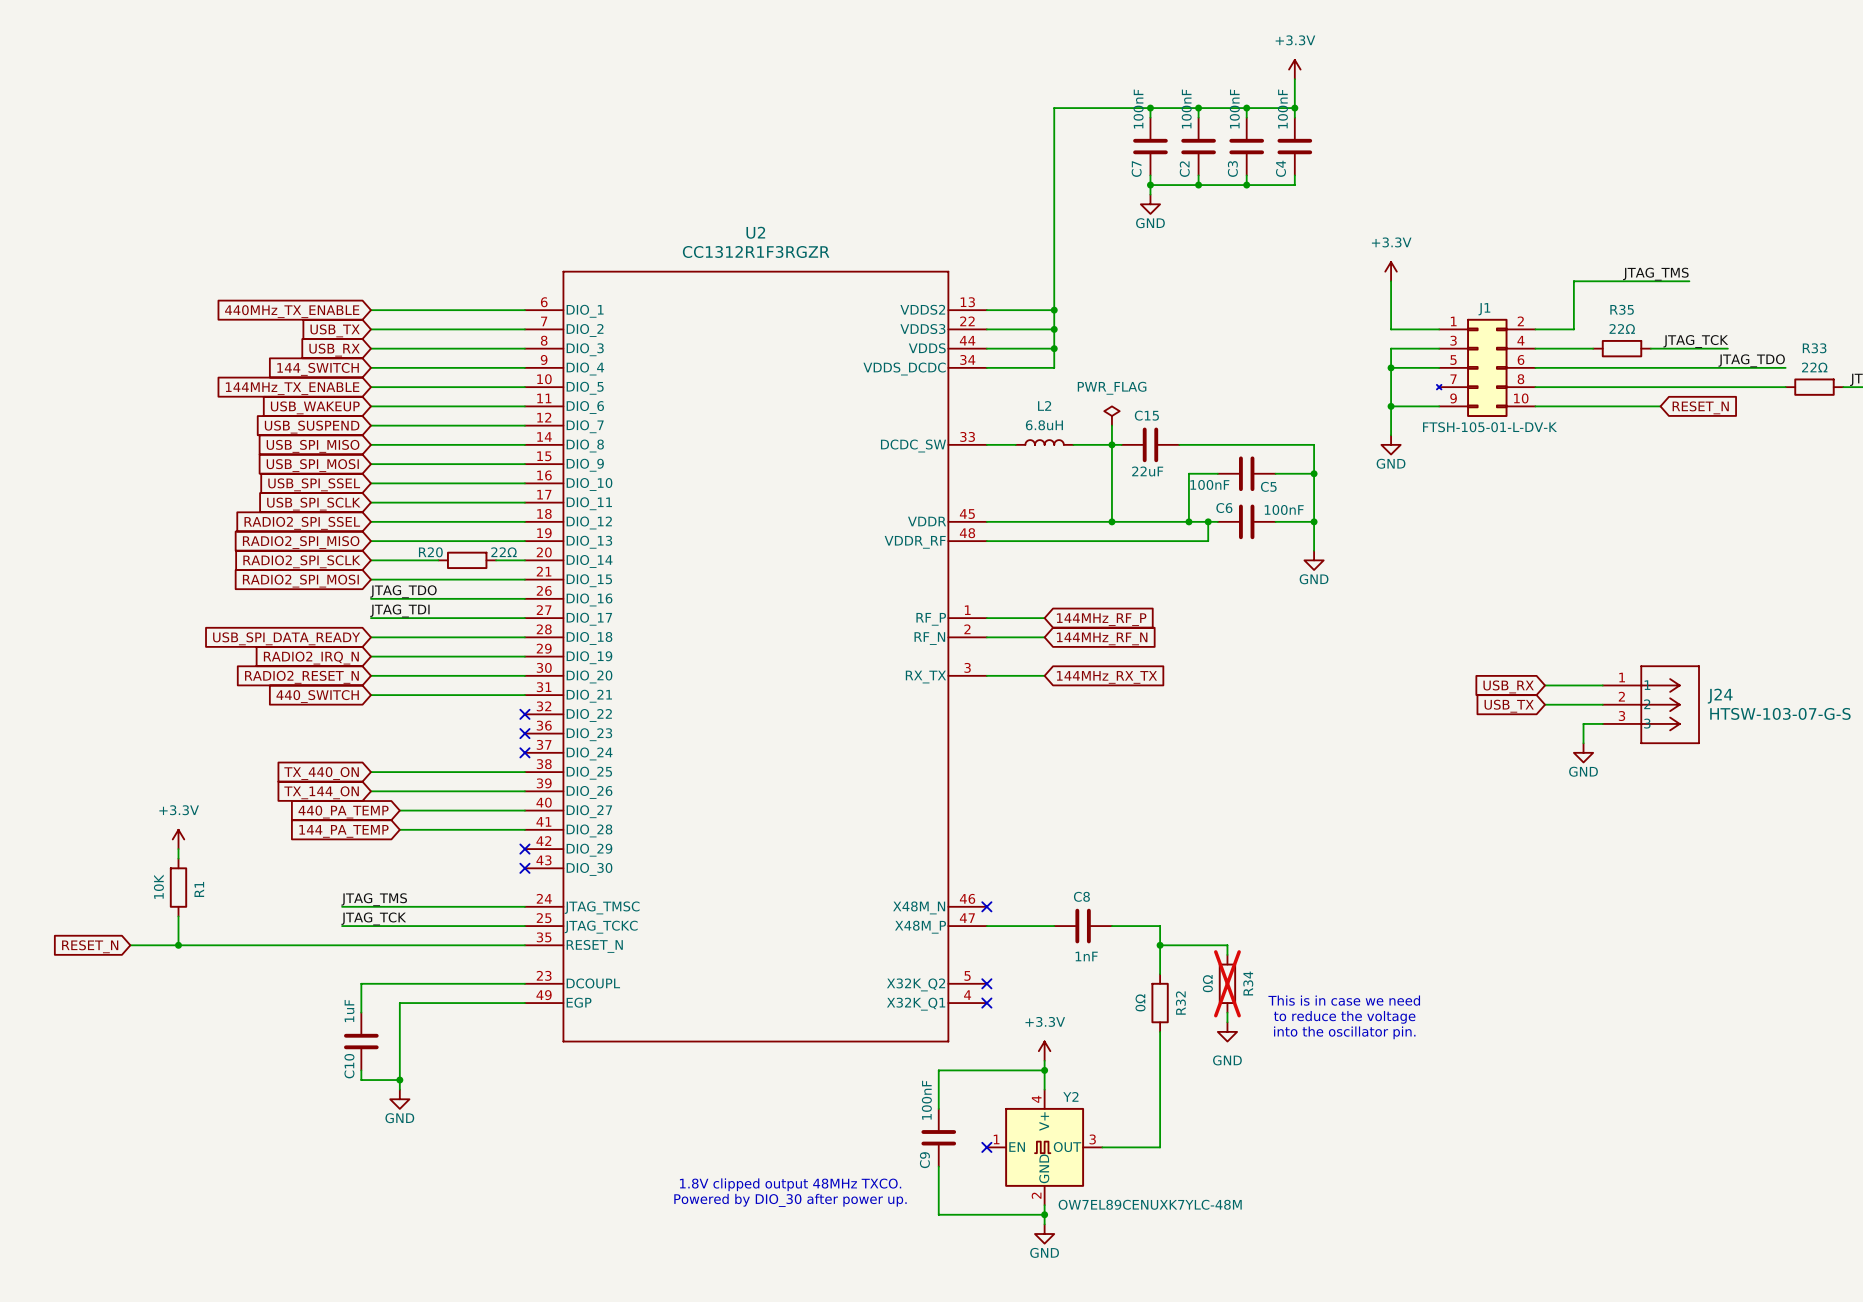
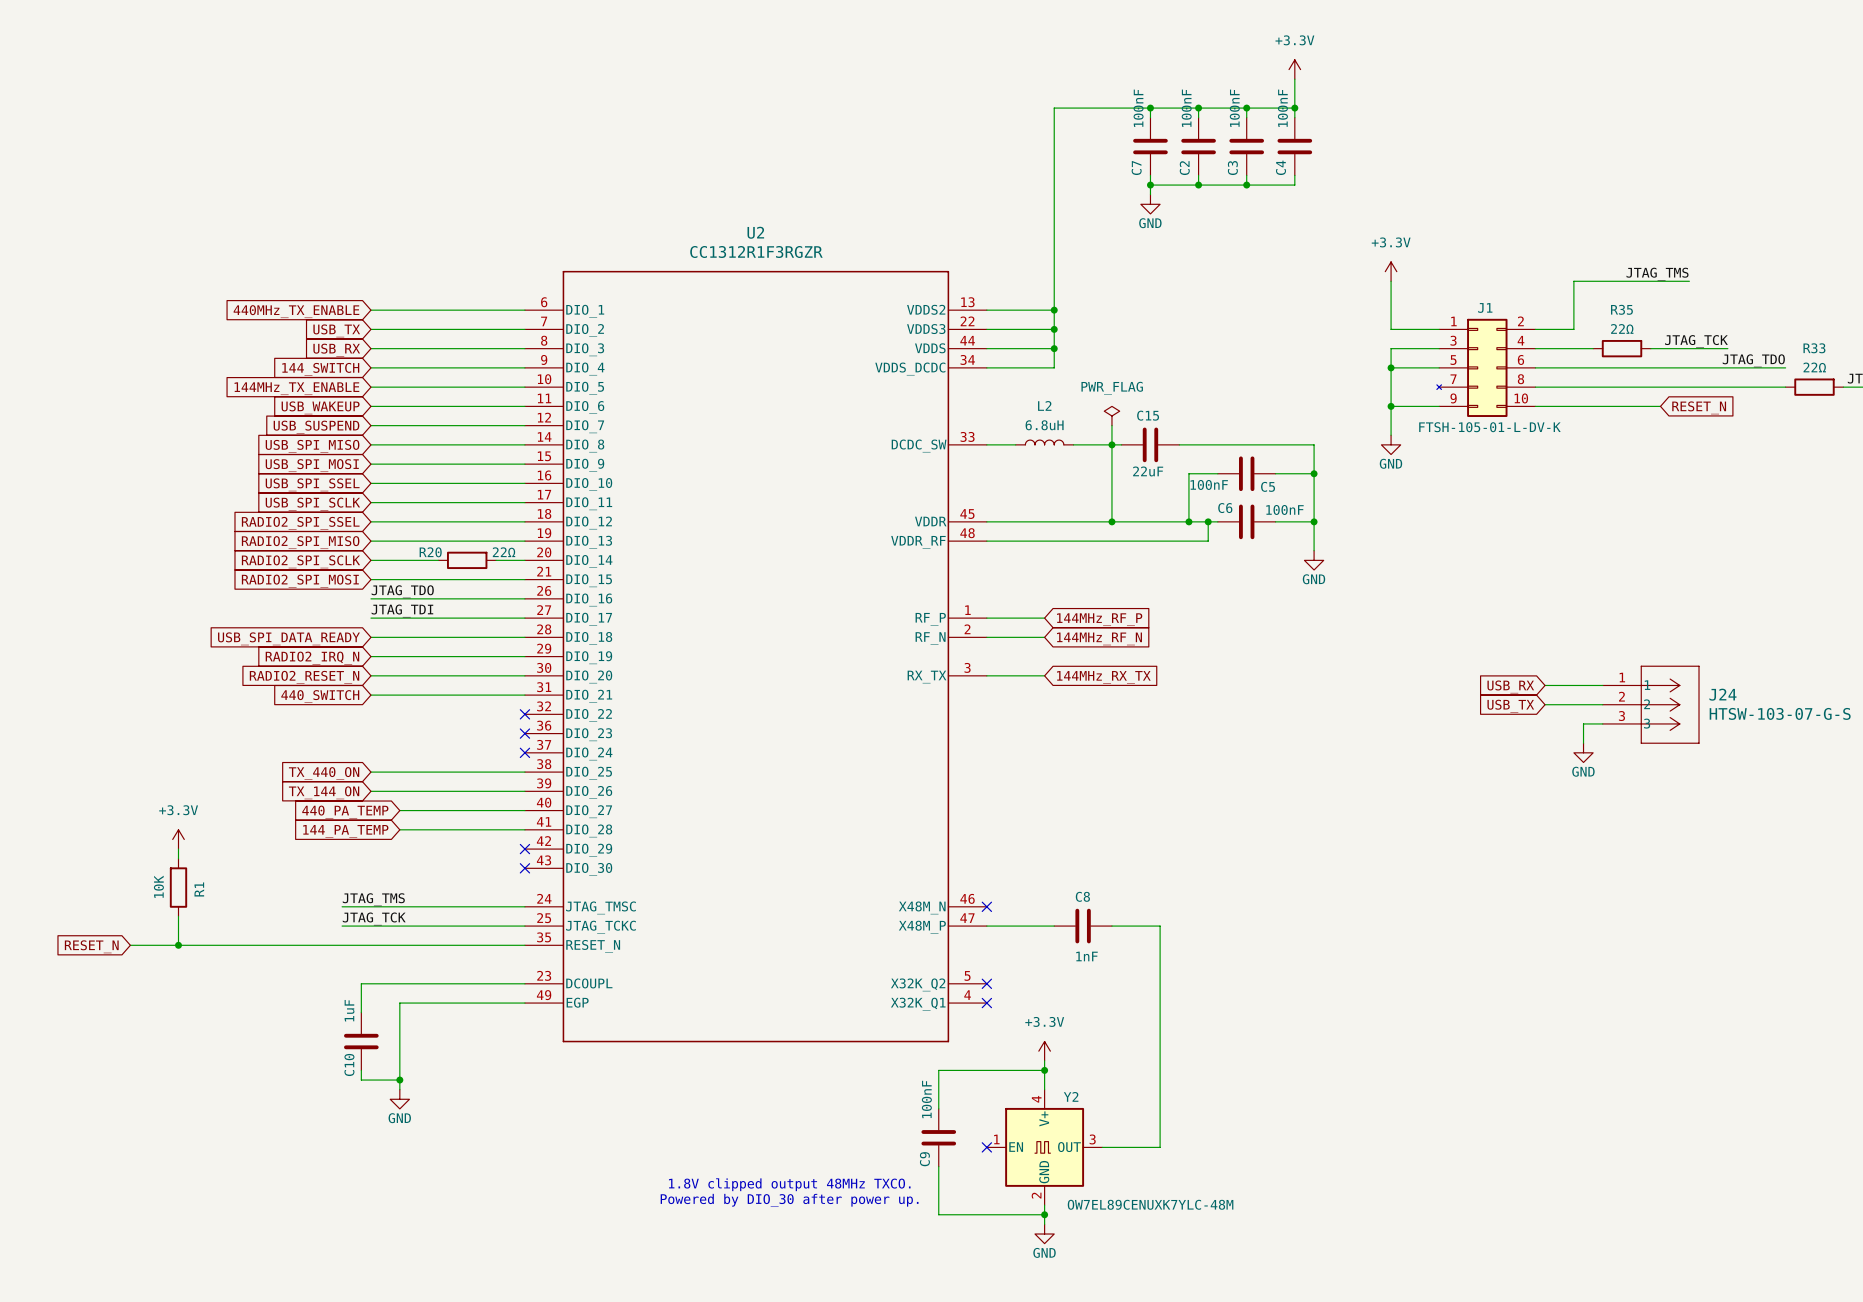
wire: (1160, 945) (1227, 945) (1227, 954) -> none
junction: (1160, 945) -> none
wire: none -> (1160, 974) (1160, 1031)
R34: 0Ω (1227, 983) -> none
text: This is in case we need (1344, 1000) -> none
R32: 0Ω (1160, 1003) -> none
wire: (1227, 1012) (1227, 1022) -> none
text: to reduce the voltage (1344, 1017) -> none
power symbol: GND (1227, 1031) -> none
text: into the oscillator pin. (1344, 1032) -> none

